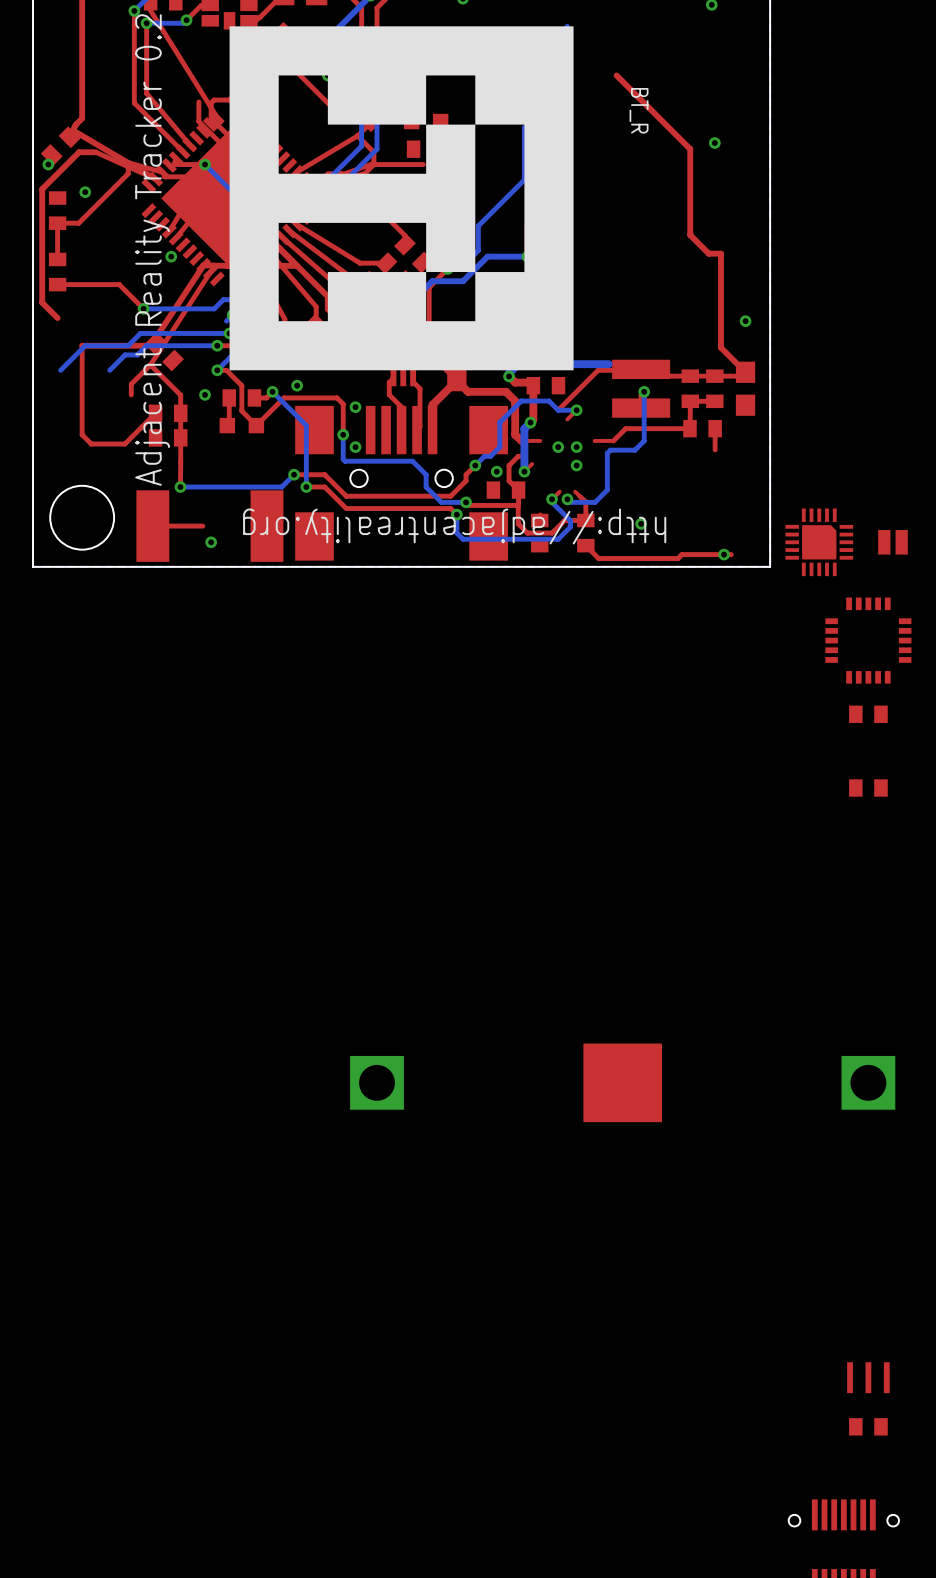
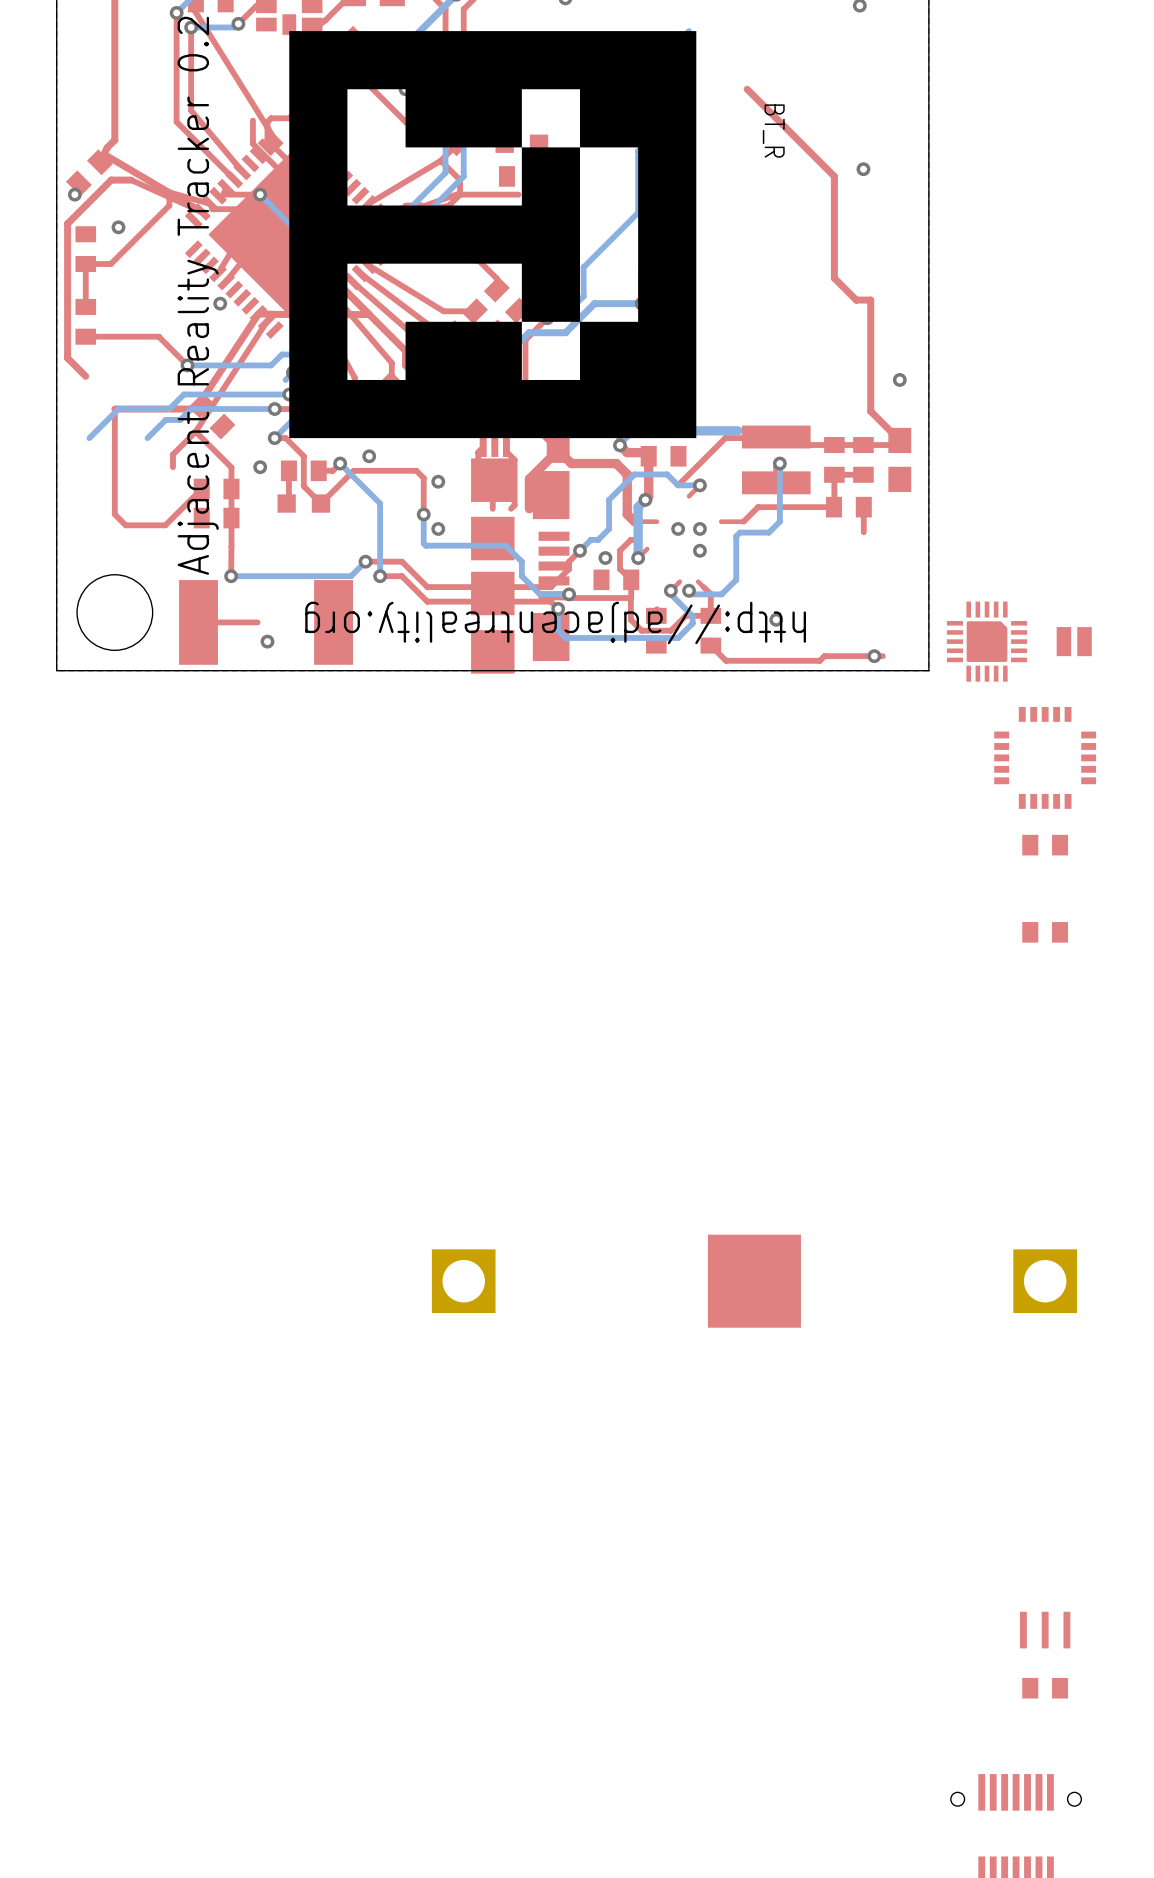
part: none -> (520, 566)
part: (401, 483) -> none

